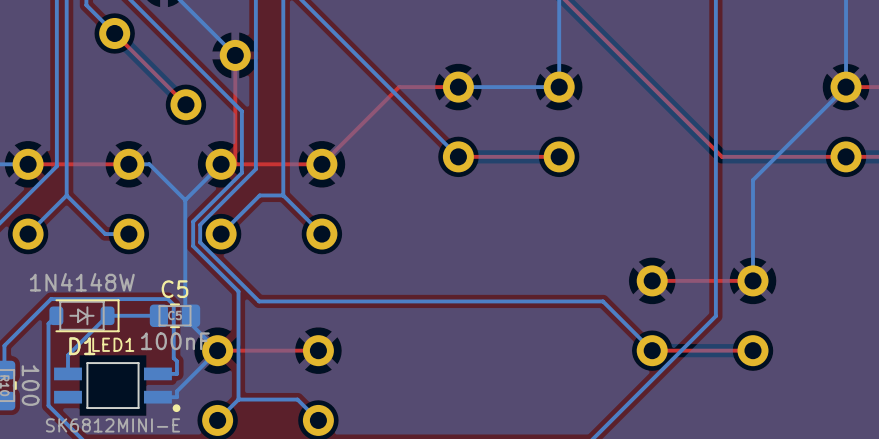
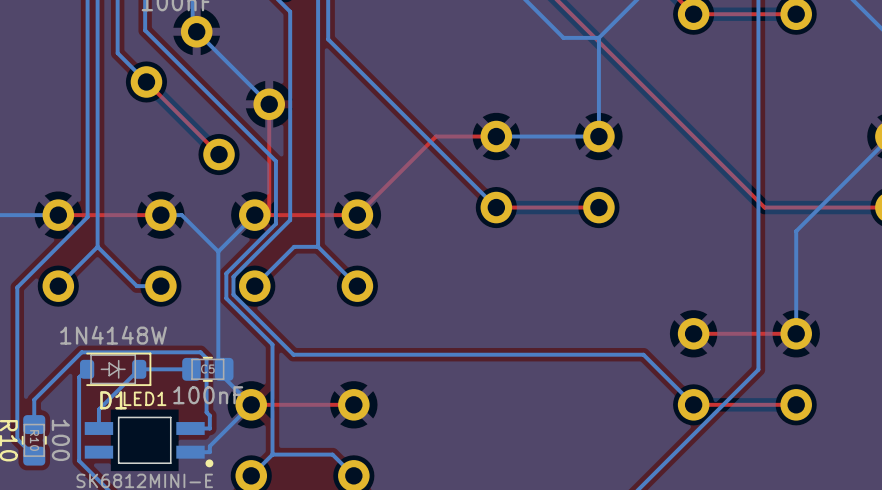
text: C5 (174, 289) -> none

